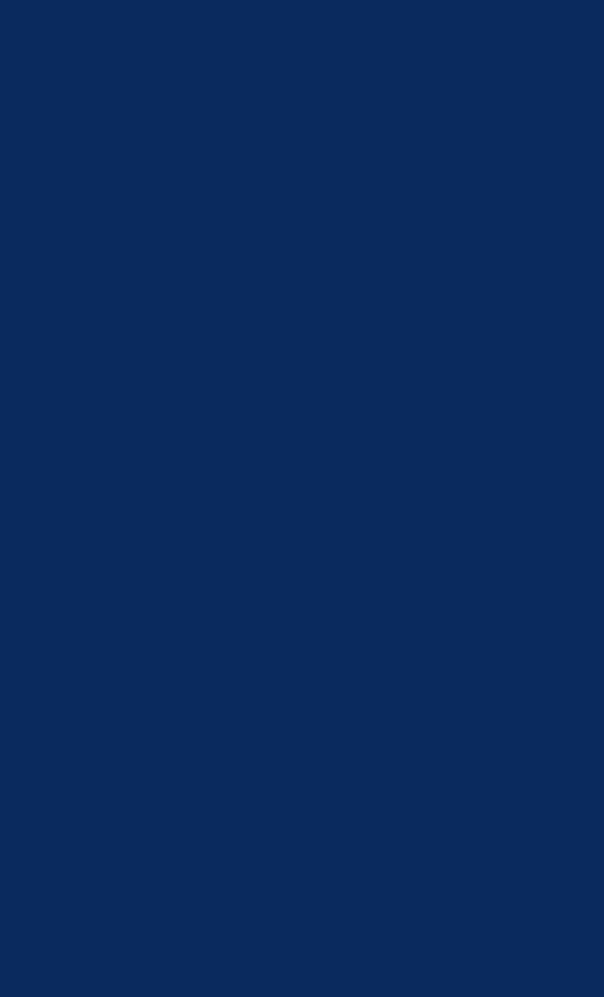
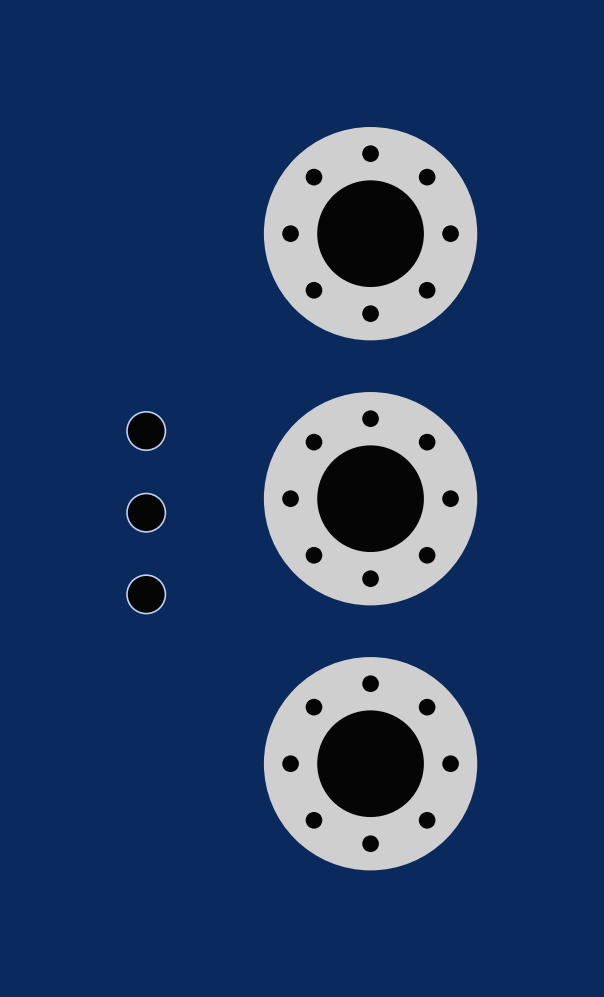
part: none -> (370, 233)
part: none -> (146, 431)
part: none -> (370, 498)
part: none -> (146, 512)
part: none -> (146, 594)
part: none -> (370, 763)

